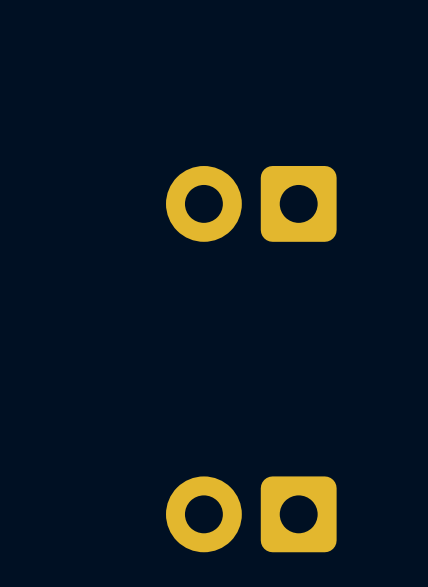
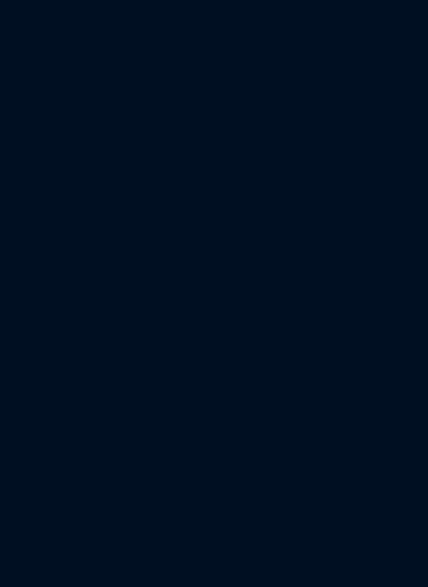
part: (251, 203) -> none
part: (251, 514) -> none

